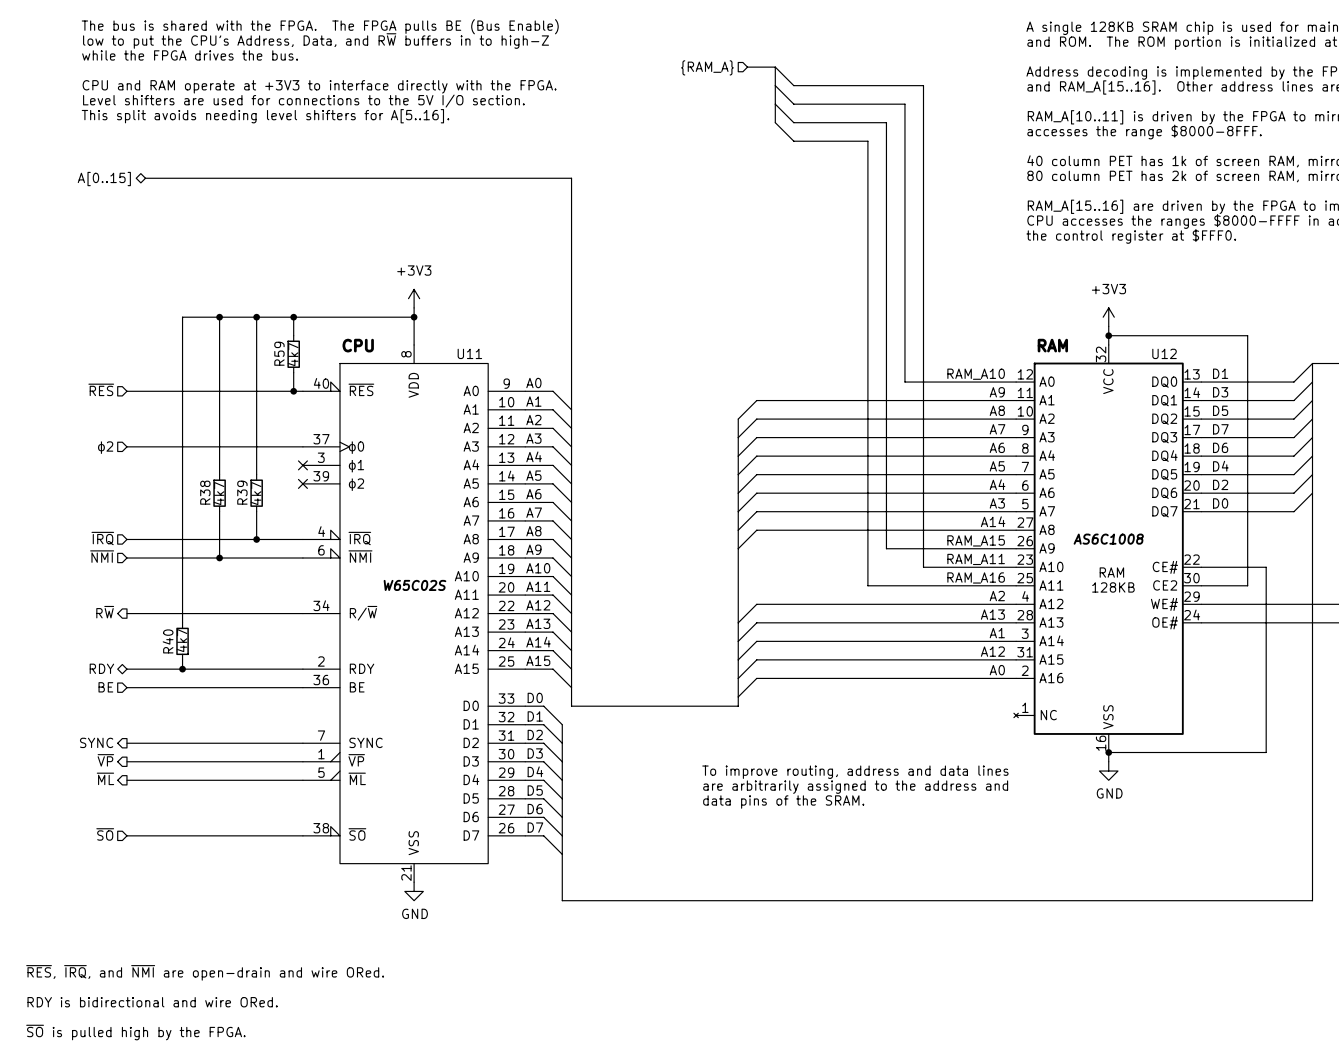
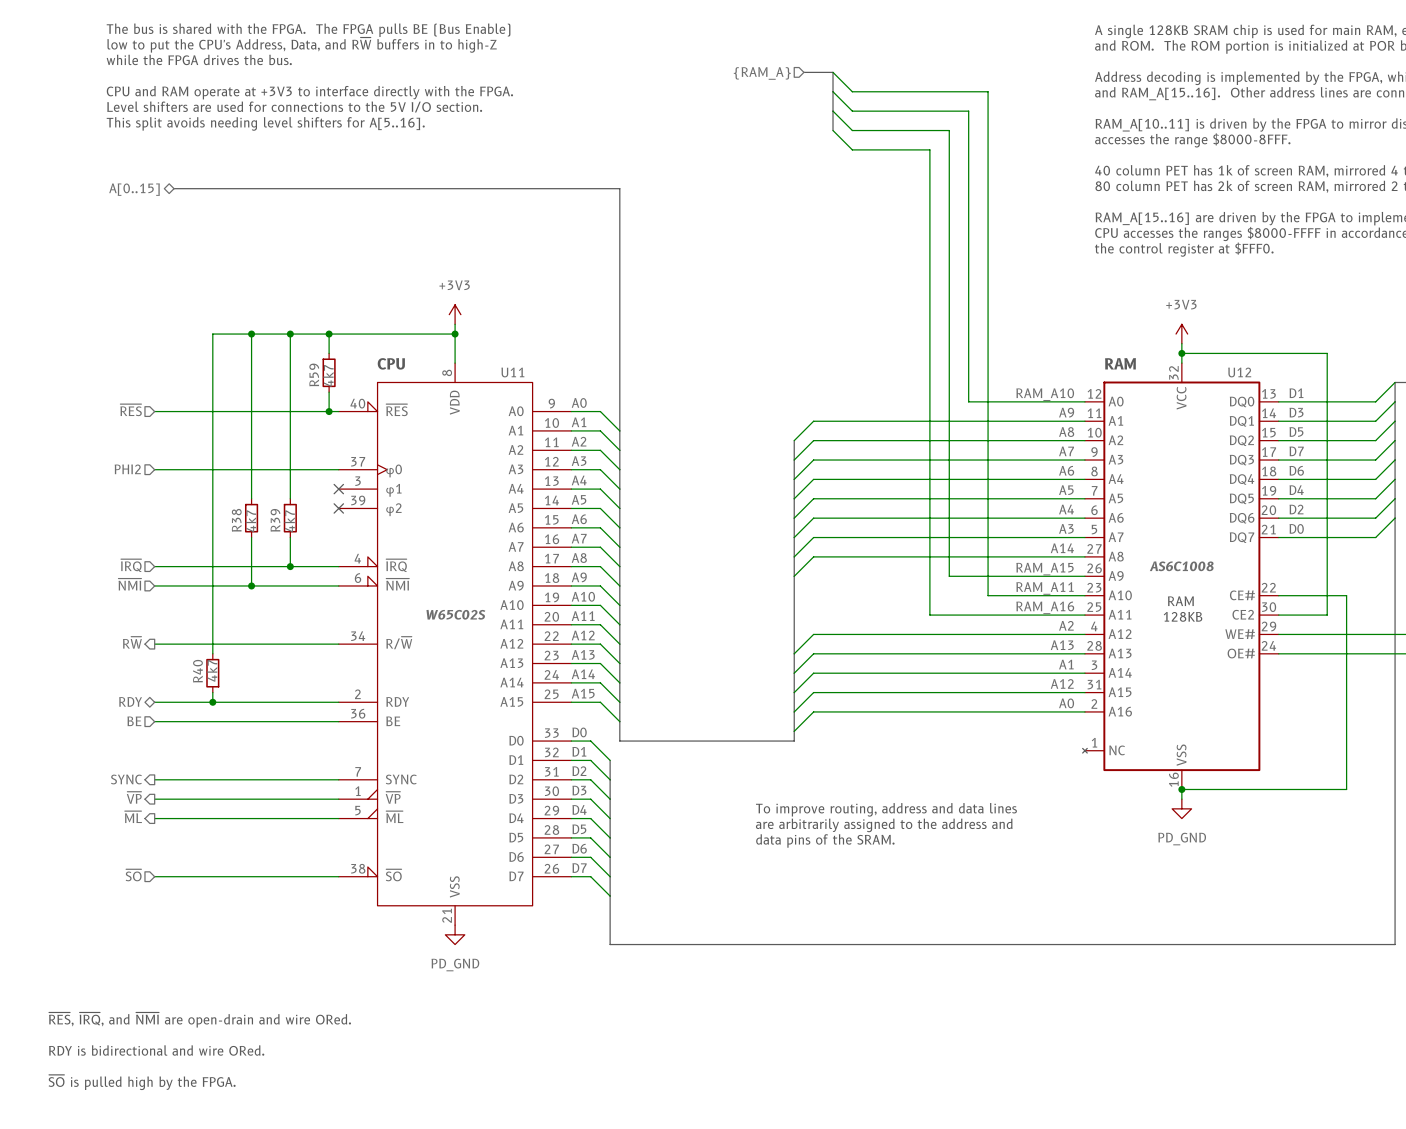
hierarchical label: ϕ2 (105, 447) -> PHI2 (127, 469)
power symbol: GND (1108, 771) -> PD_GND (1181, 808)
power symbol: GND (414, 891) -> PD_GND (455, 934)

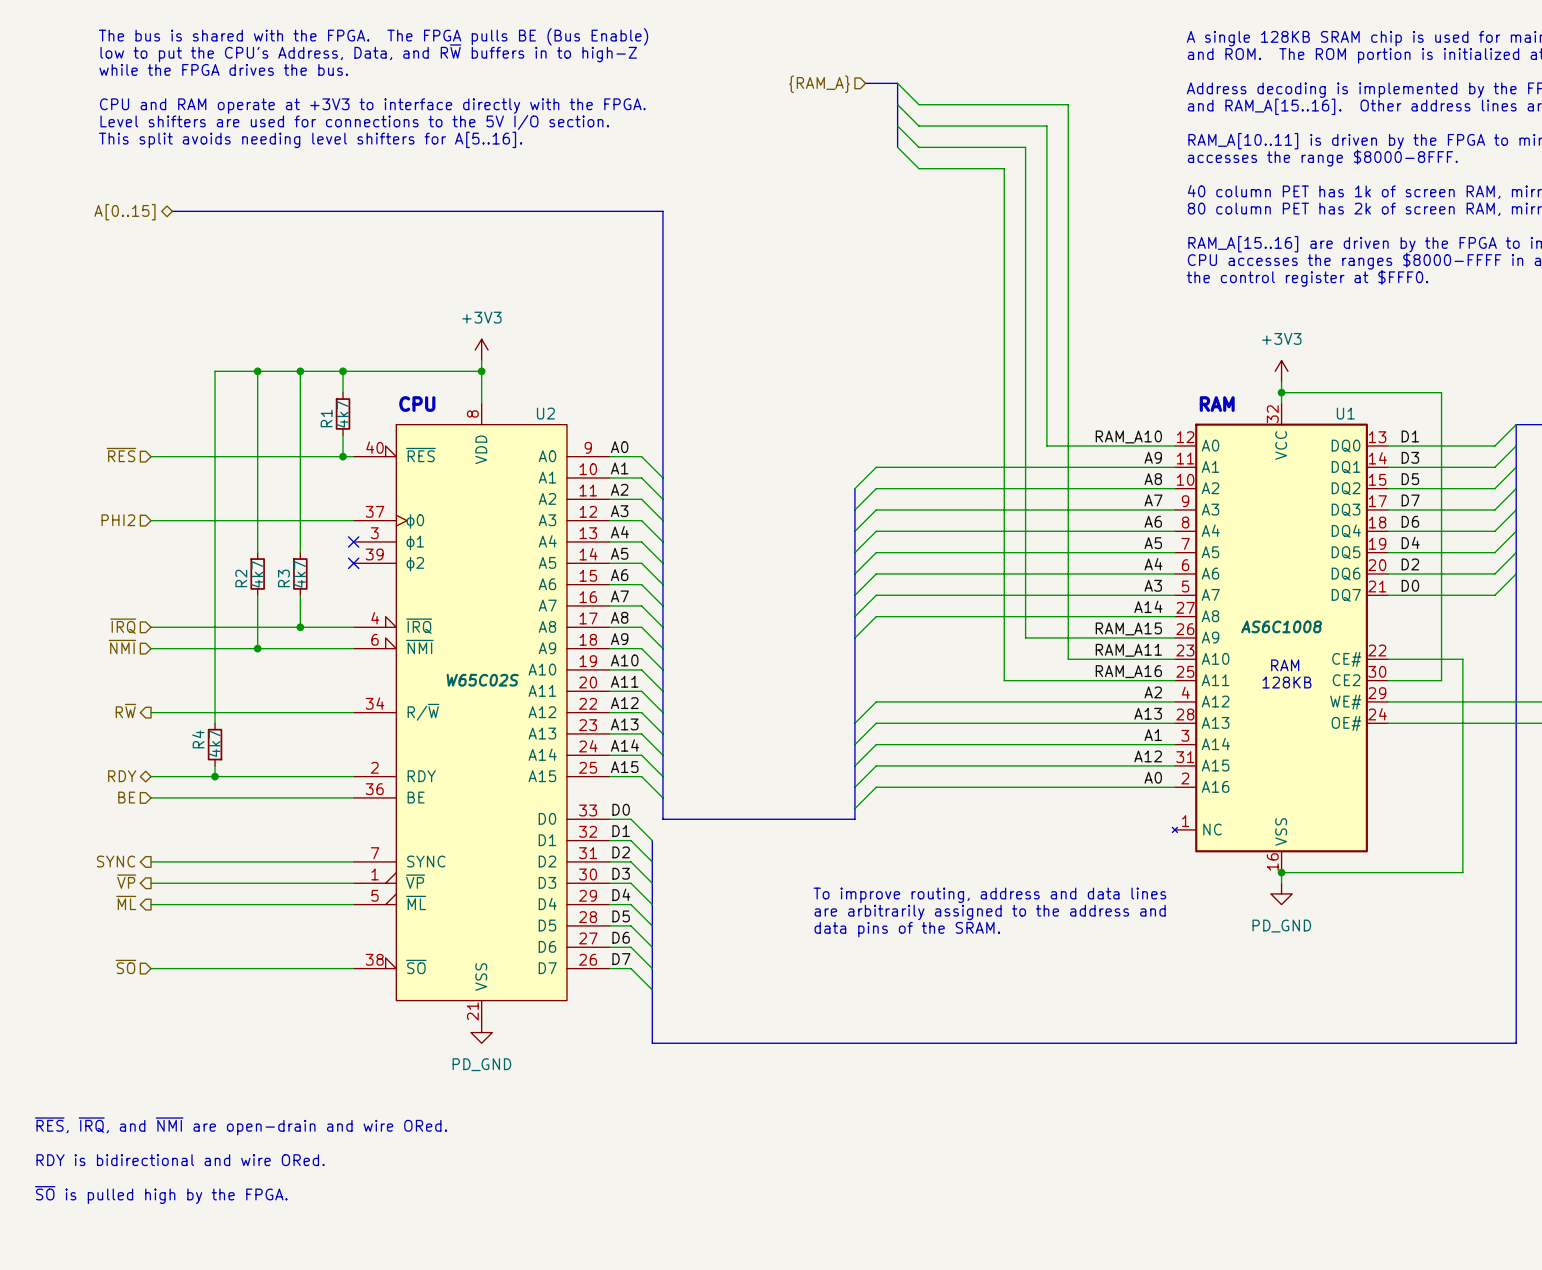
U11 name: U11 (512, 372) -> U2 (545, 413)
U12 name: U12 (1239, 372) -> U1 (1345, 413)
R59 name: R59 (314, 374) -> R1 (326, 418)
R38 name: R38 (236, 520) -> R2 (241, 578)
R39 name: R39 (275, 520) -> R3 (283, 578)
R40 name: R40 (197, 671) -> R4 (198, 739)

